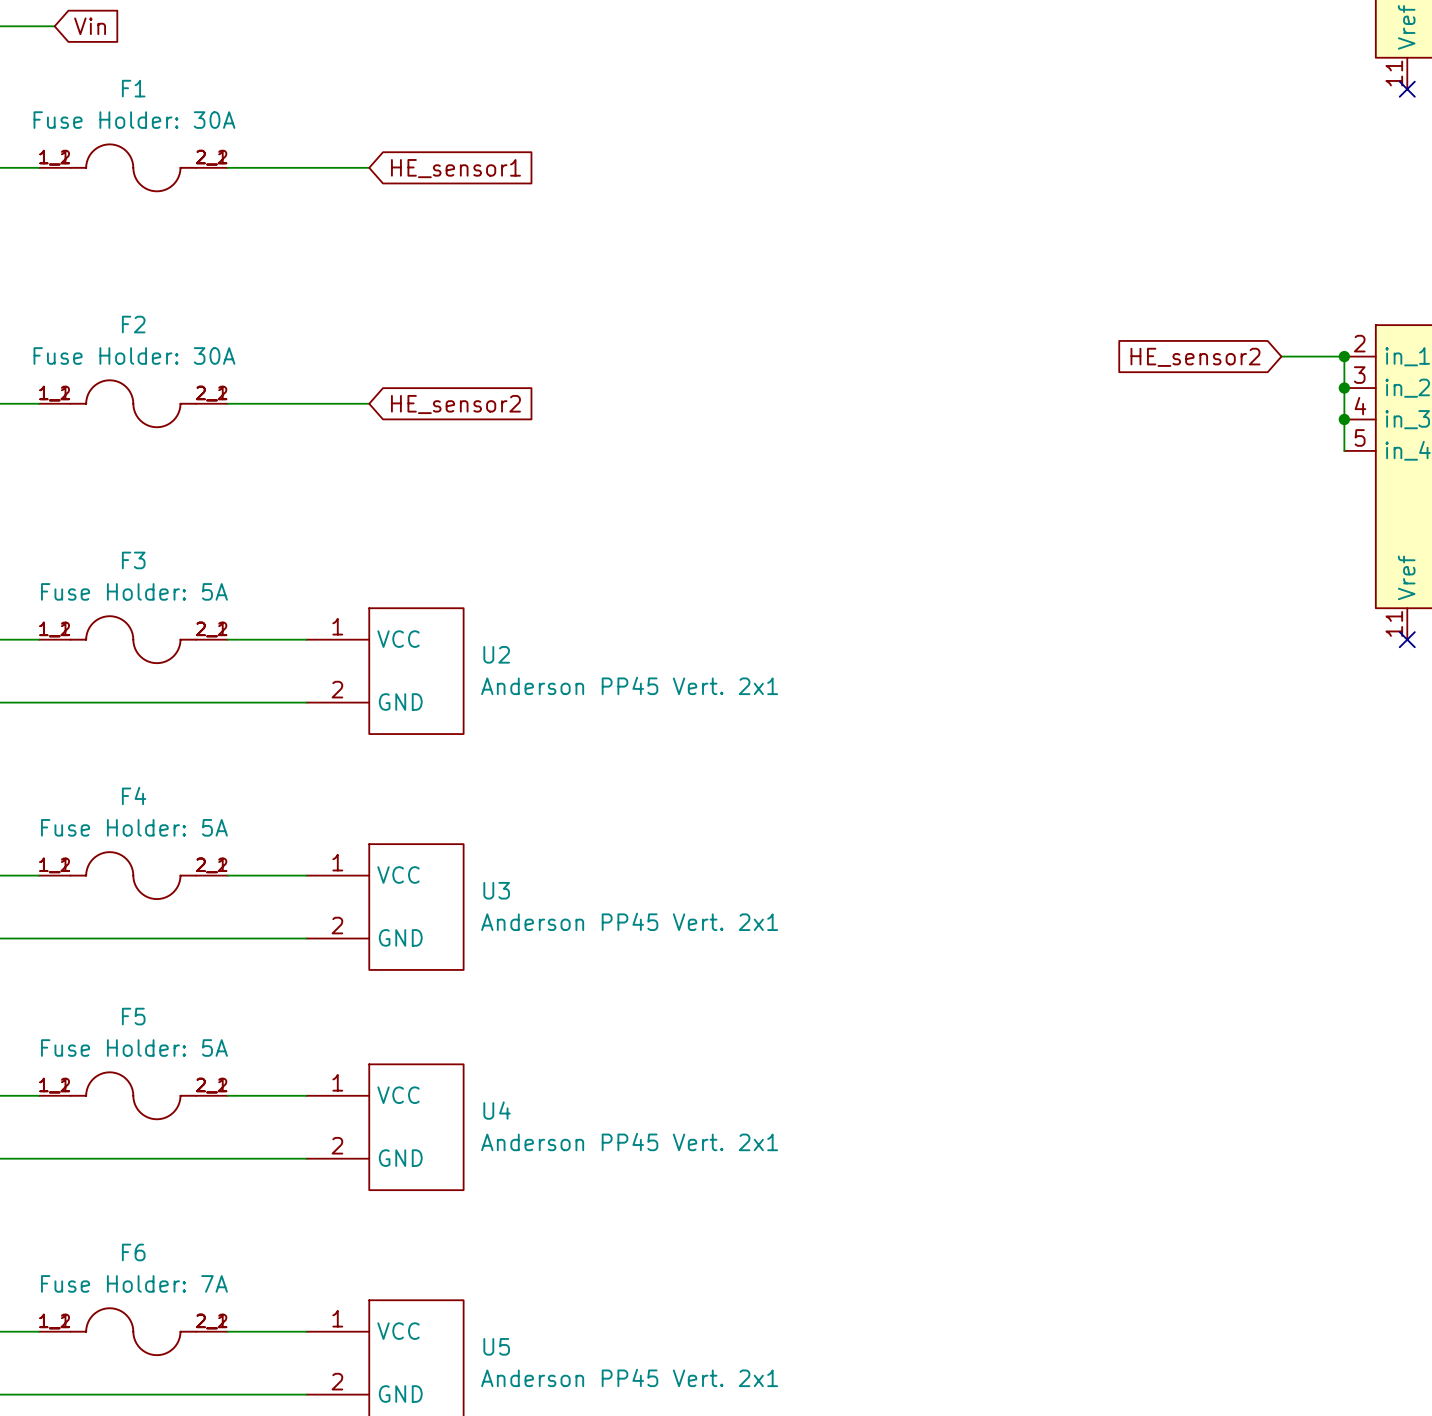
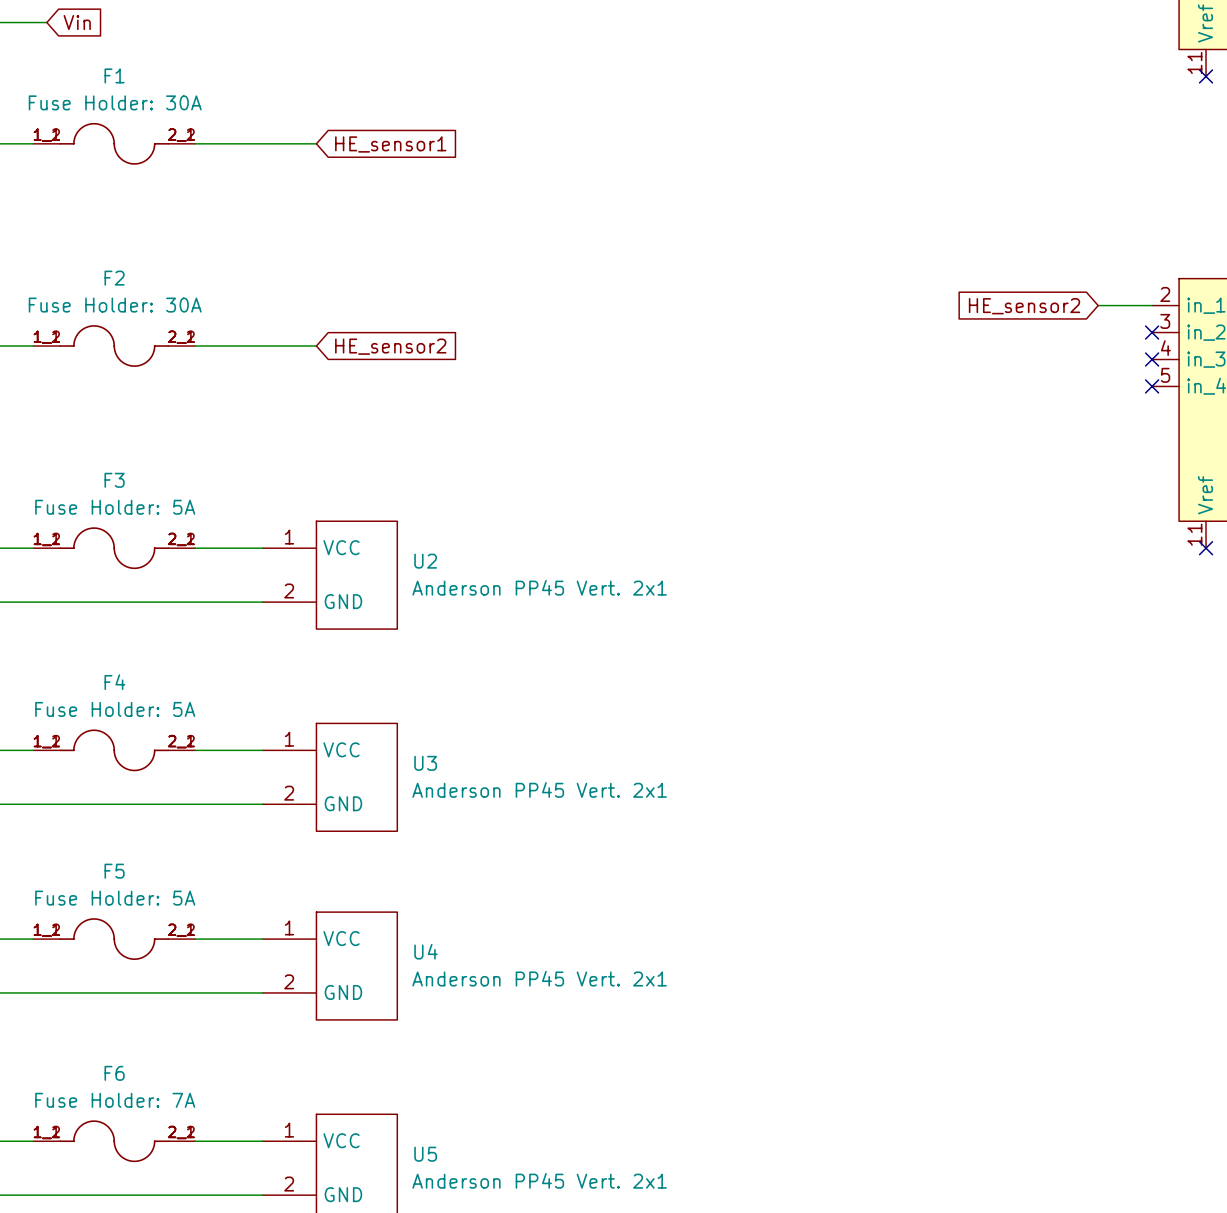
wire: (1344, 356) (1344, 450) -> none
junction: (1344, 356) -> none
junction: (1344, 388) -> none
no-connect mark: none -> (1152, 332)
junction: (1344, 419) -> none
no-connect mark: none -> (1152, 359)
no-connect mark: none -> (1152, 386)

